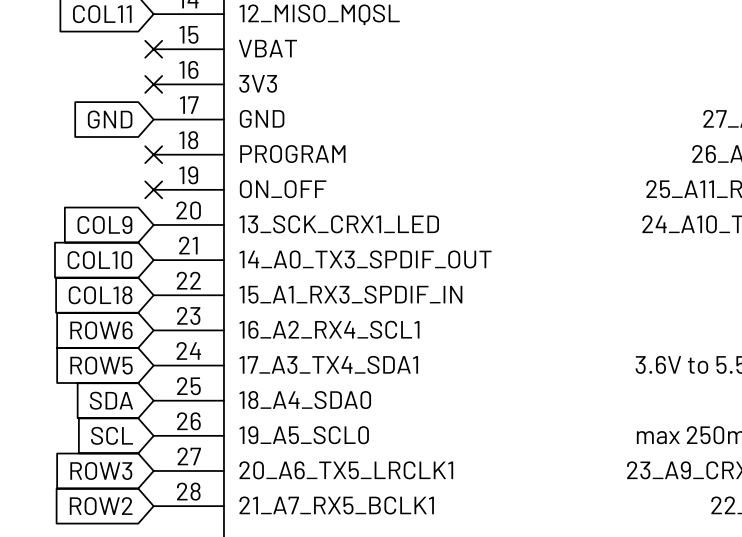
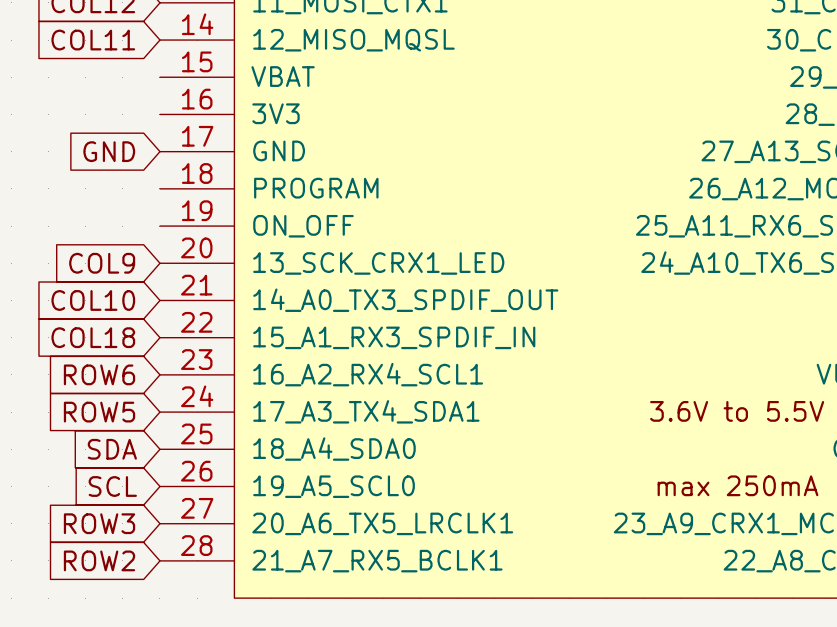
no-connect mark: (153, 49) -> none
no-connect mark: (153, 84) -> none
no-connect mark: (153, 154) -> none
no-connect mark: (153, 189) -> none

